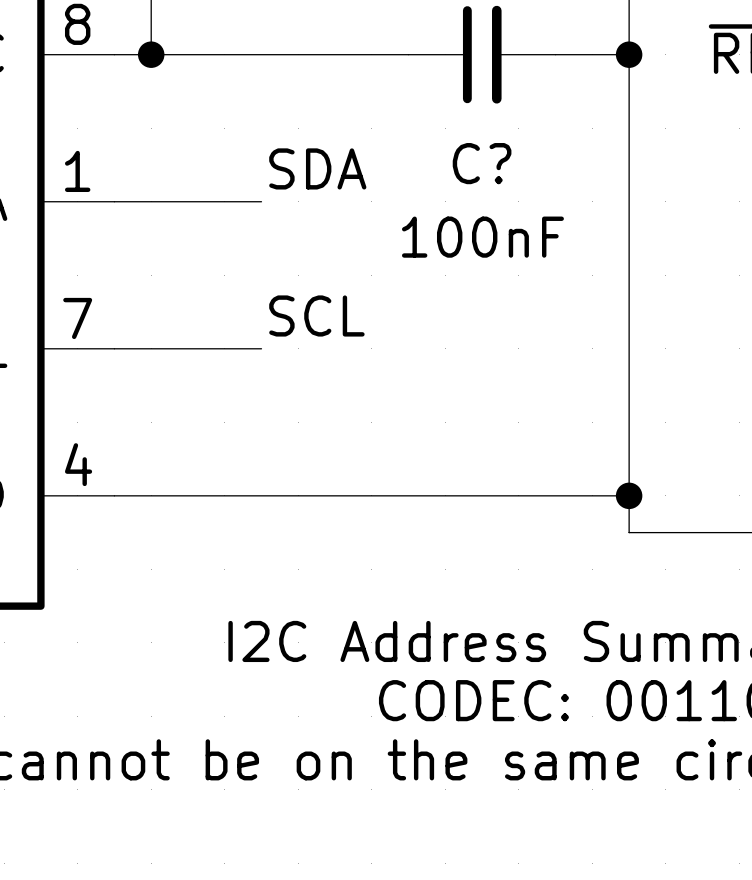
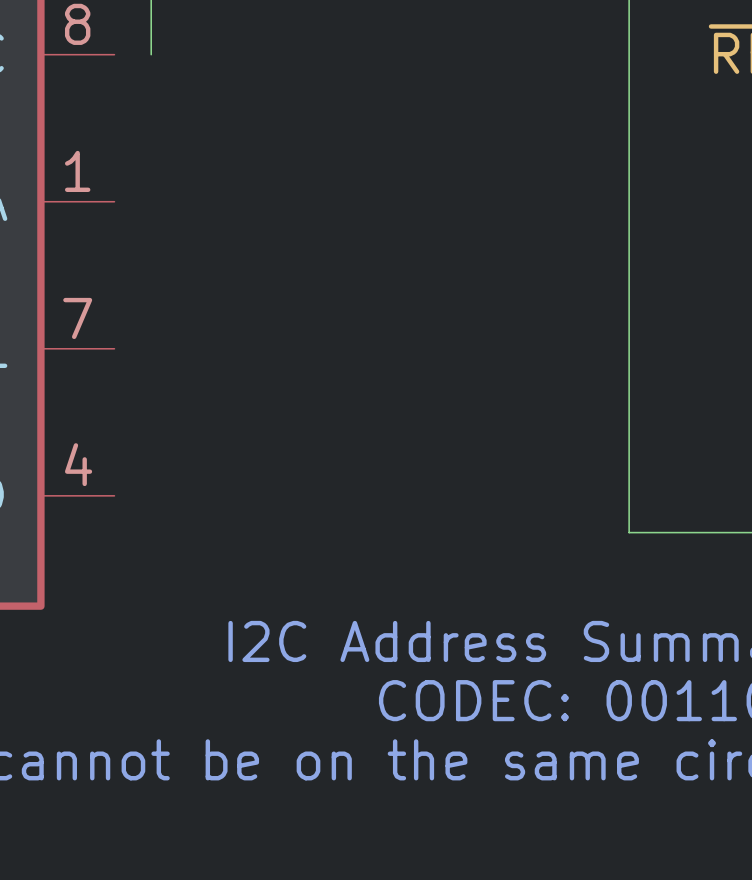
wire: (114, 54) (408, 54) -> none
junction: (151, 54) -> none
C?: 100nF (482, 54) -> none
wire: (555, 54) (629, 54) -> none
junction: (629, 54) -> none
label: SDA (317, 168) -> none
wire: (114, 201) (261, 201) -> none
label: SCL (316, 315) -> none
wire: (114, 348) (261, 348) -> none
wire: (114, 495) (629, 495) -> none
junction: (629, 495) -> none

